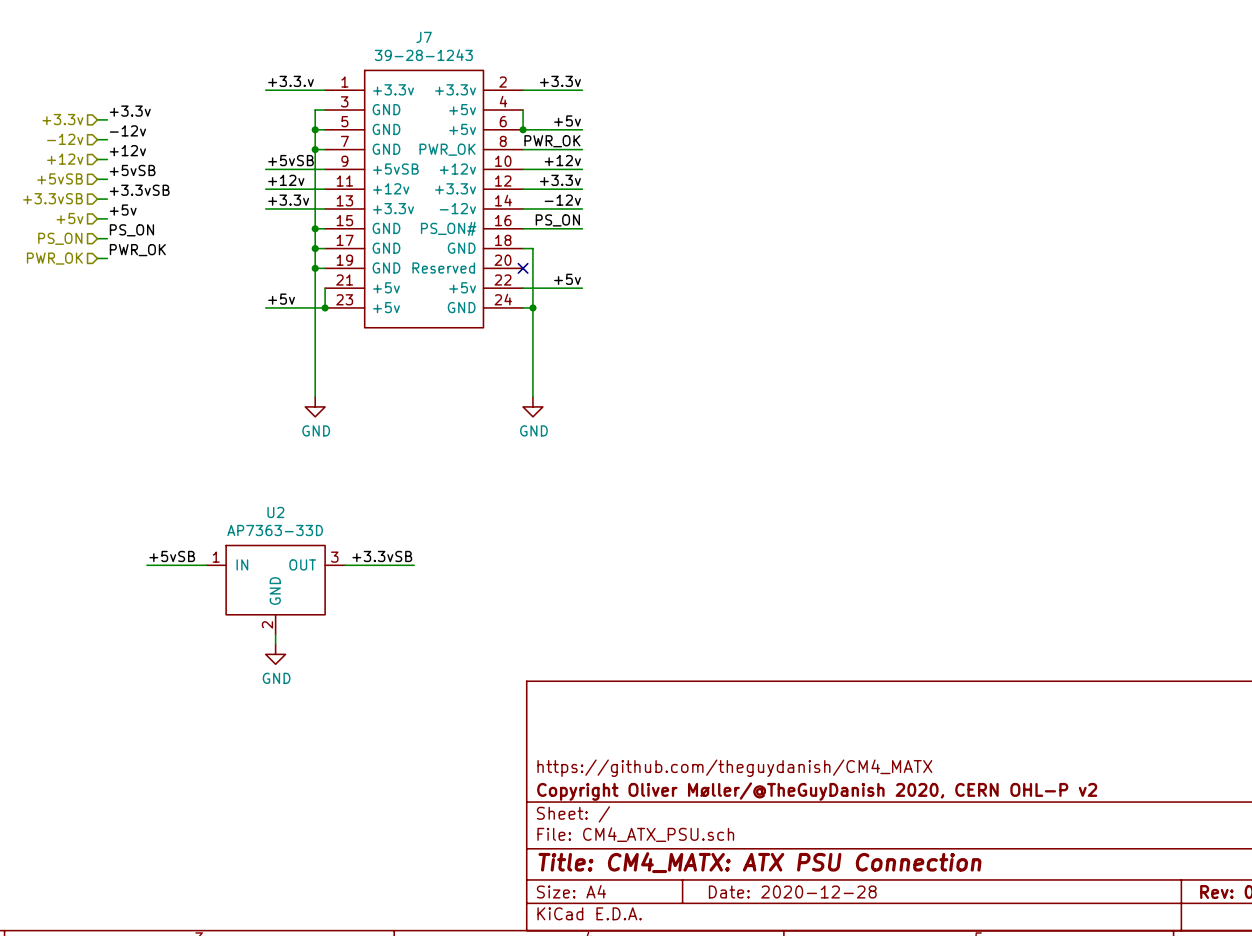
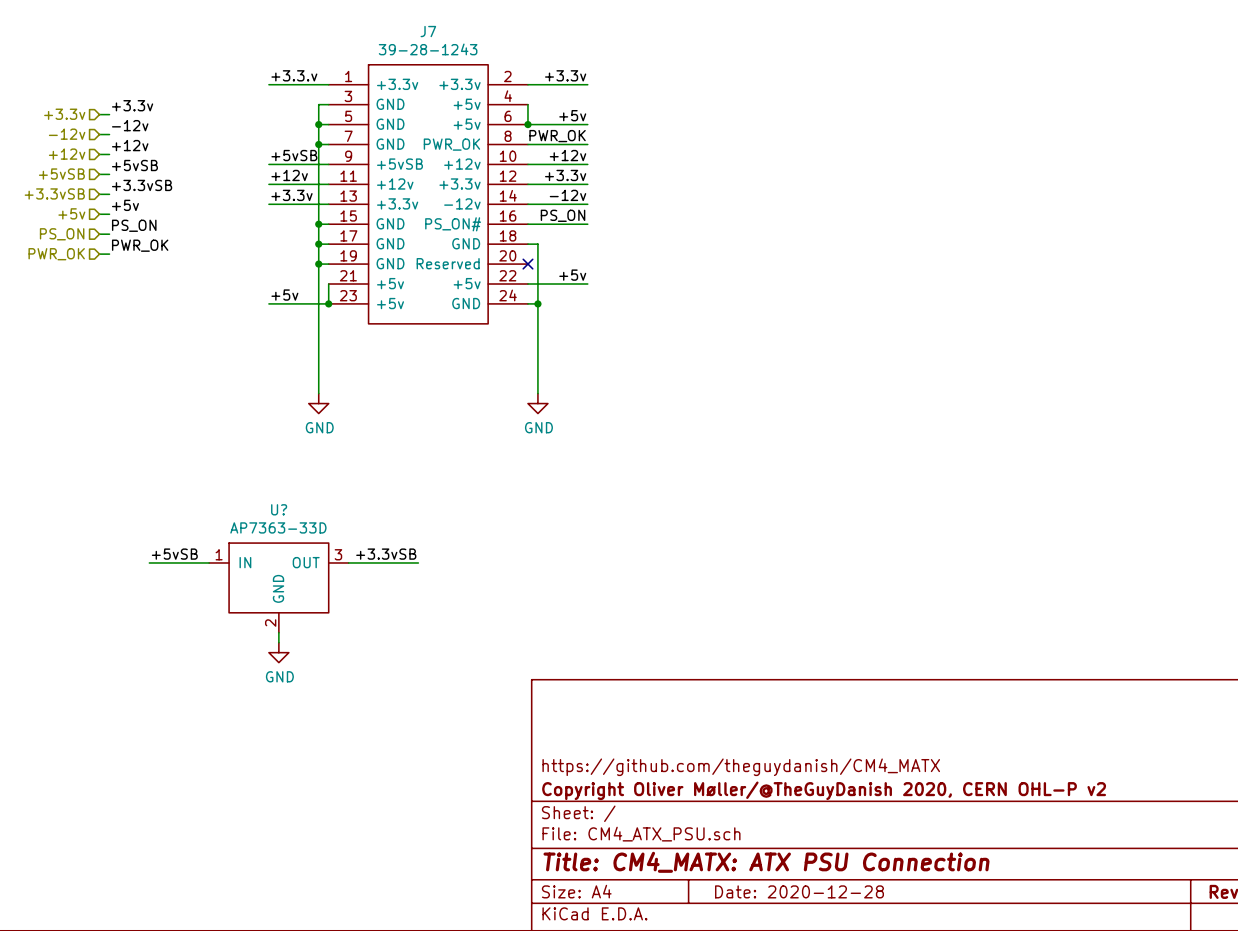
U2 name: U2 (275, 512) -> U? (279, 509)

